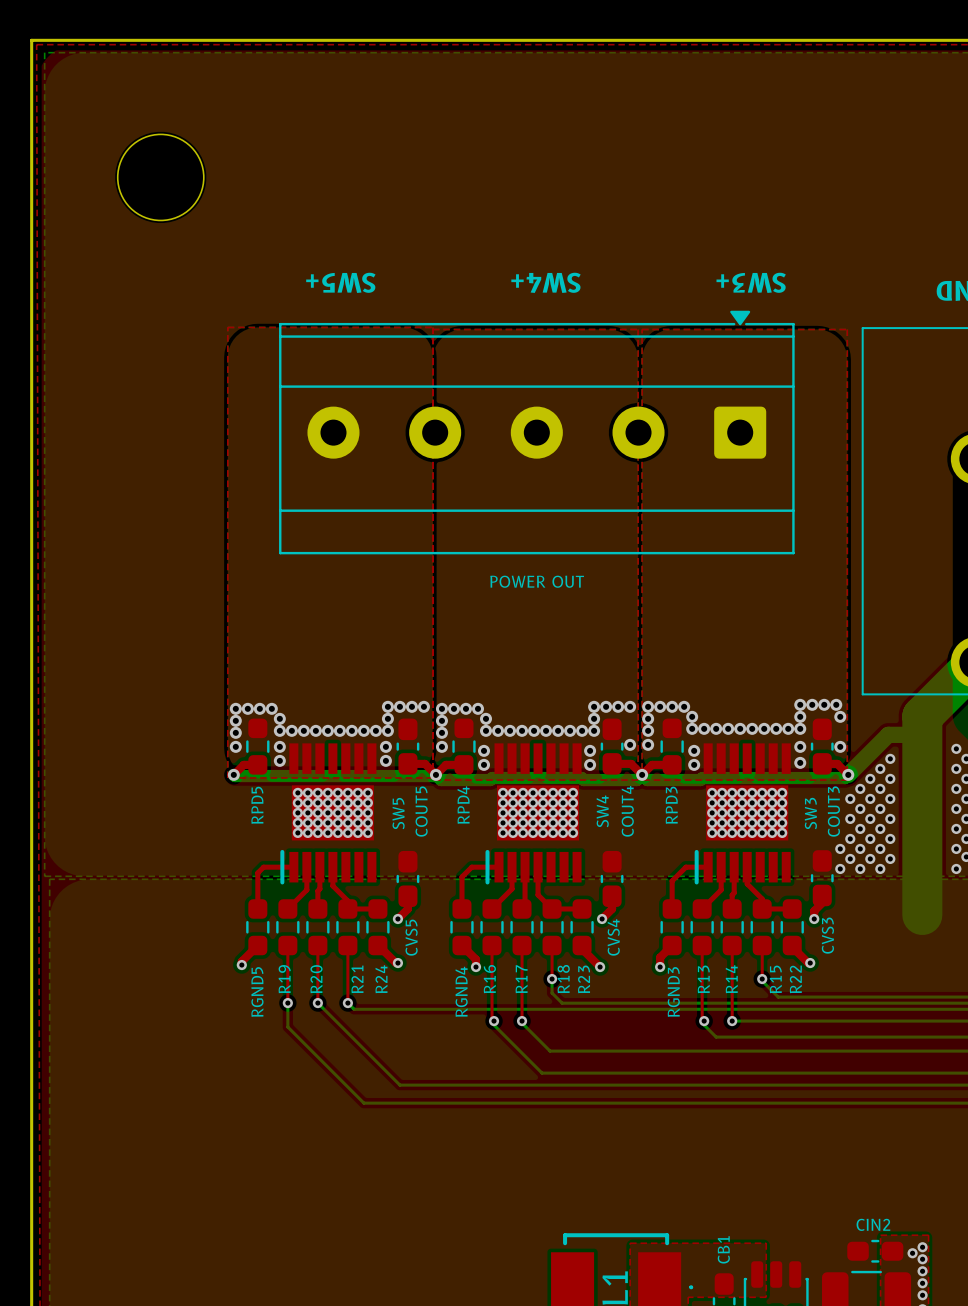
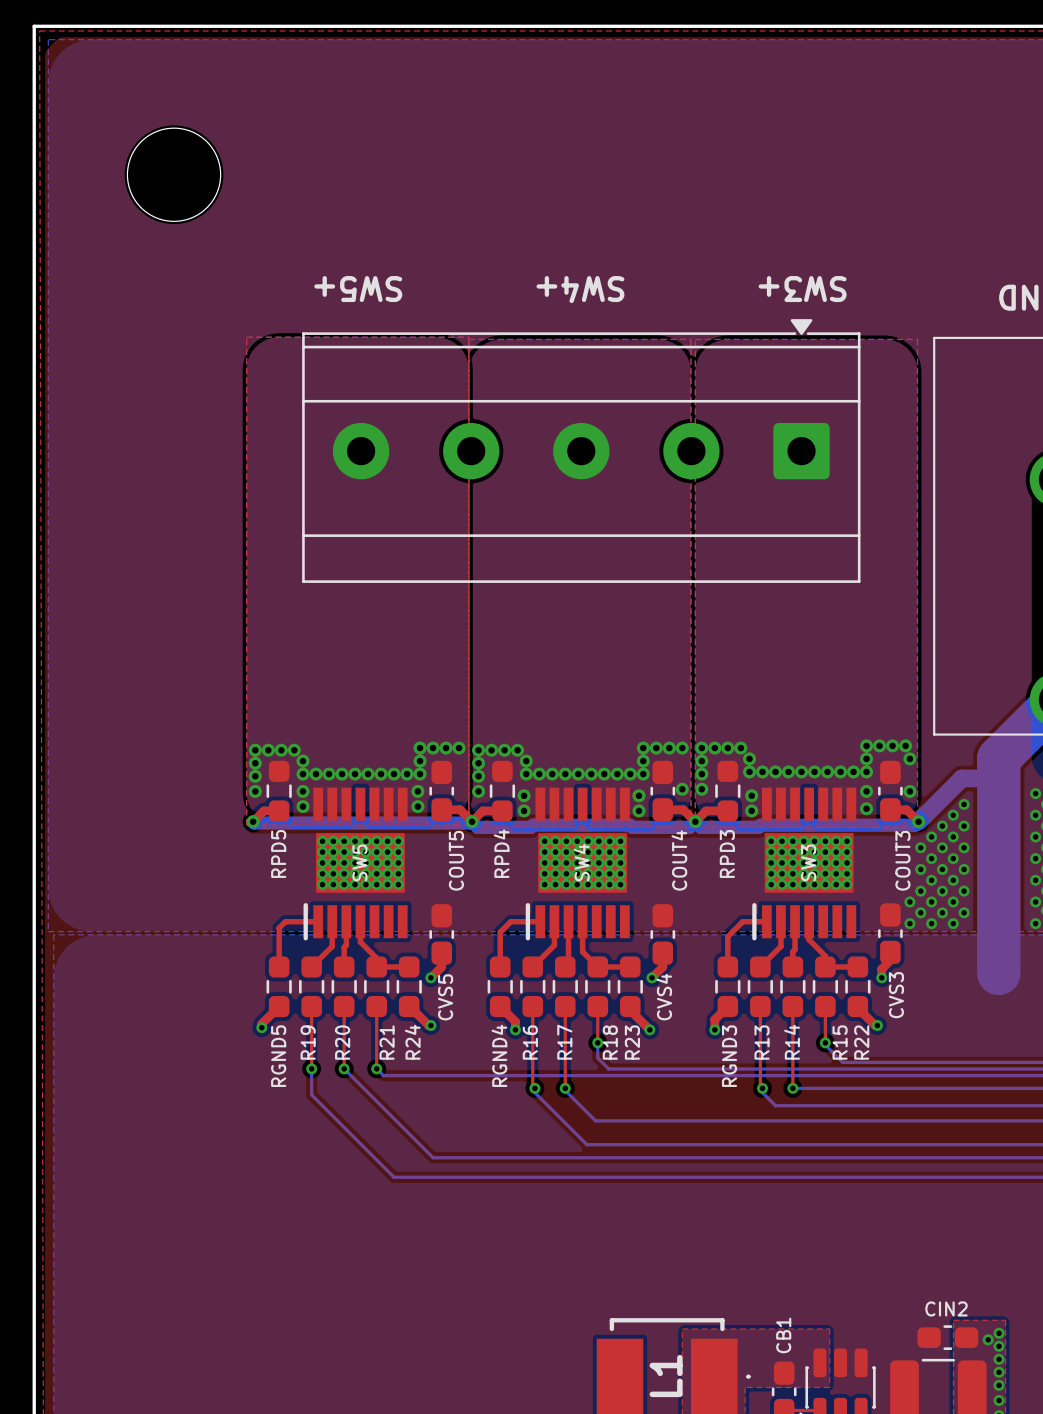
part value: POWER OUT (537, 581) -> none
SW4 name position: SW4 (602, 811) -> SW4 (581, 862)
SW5 name position: SW5 (398, 813) -> SW5 (359, 862)
SW3 name position: SW3 (810, 813) -> SW3 (808, 862)

